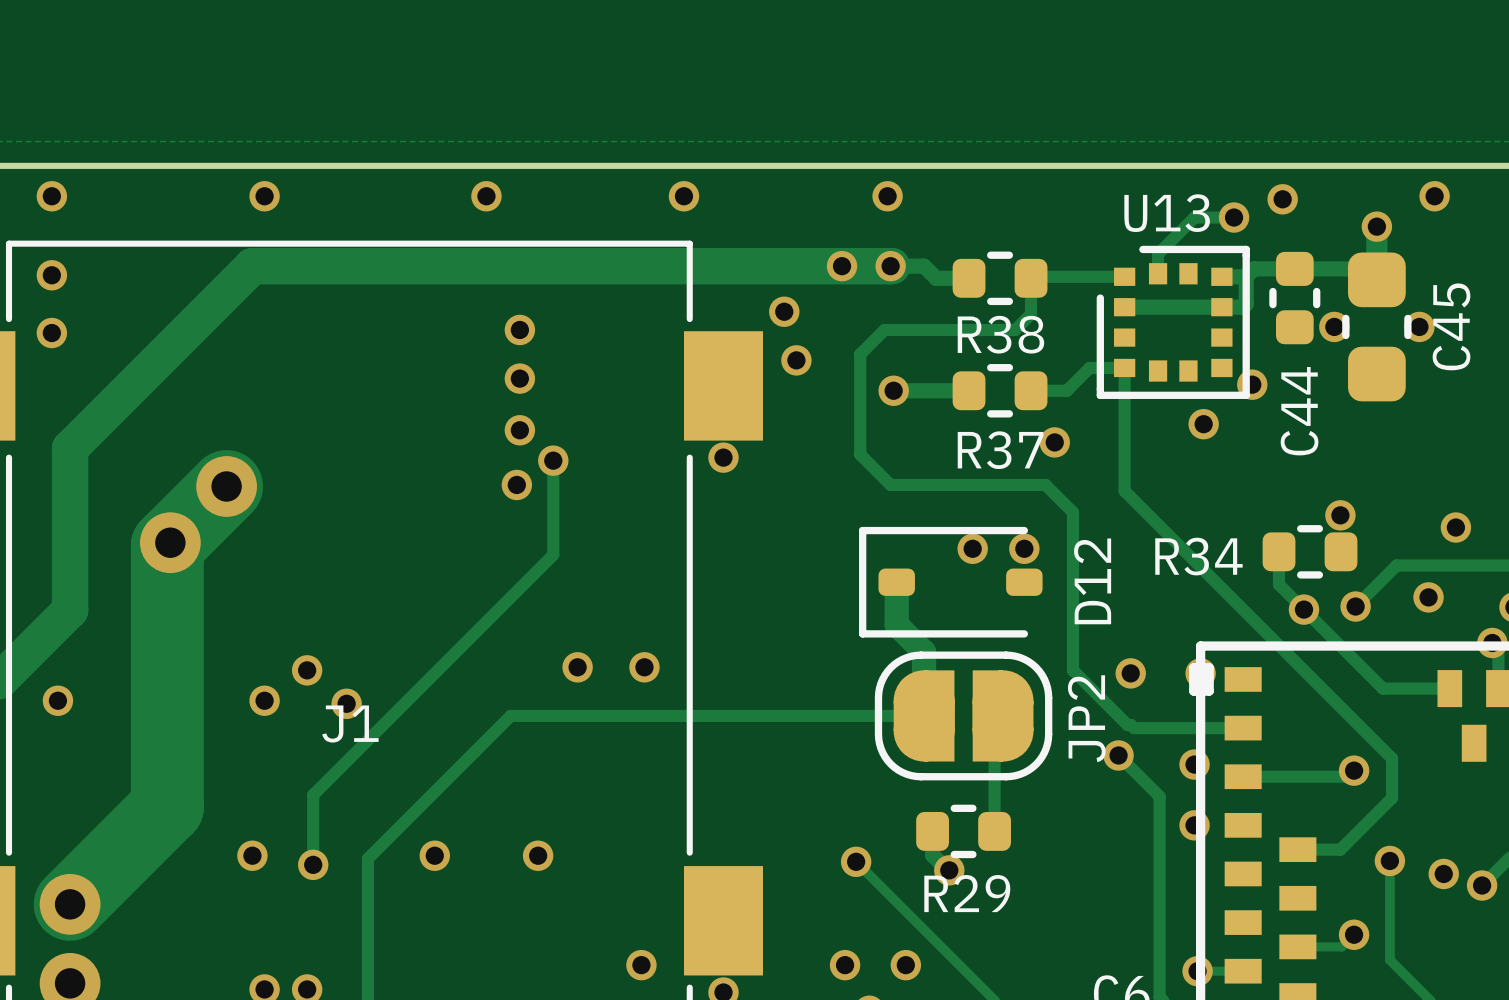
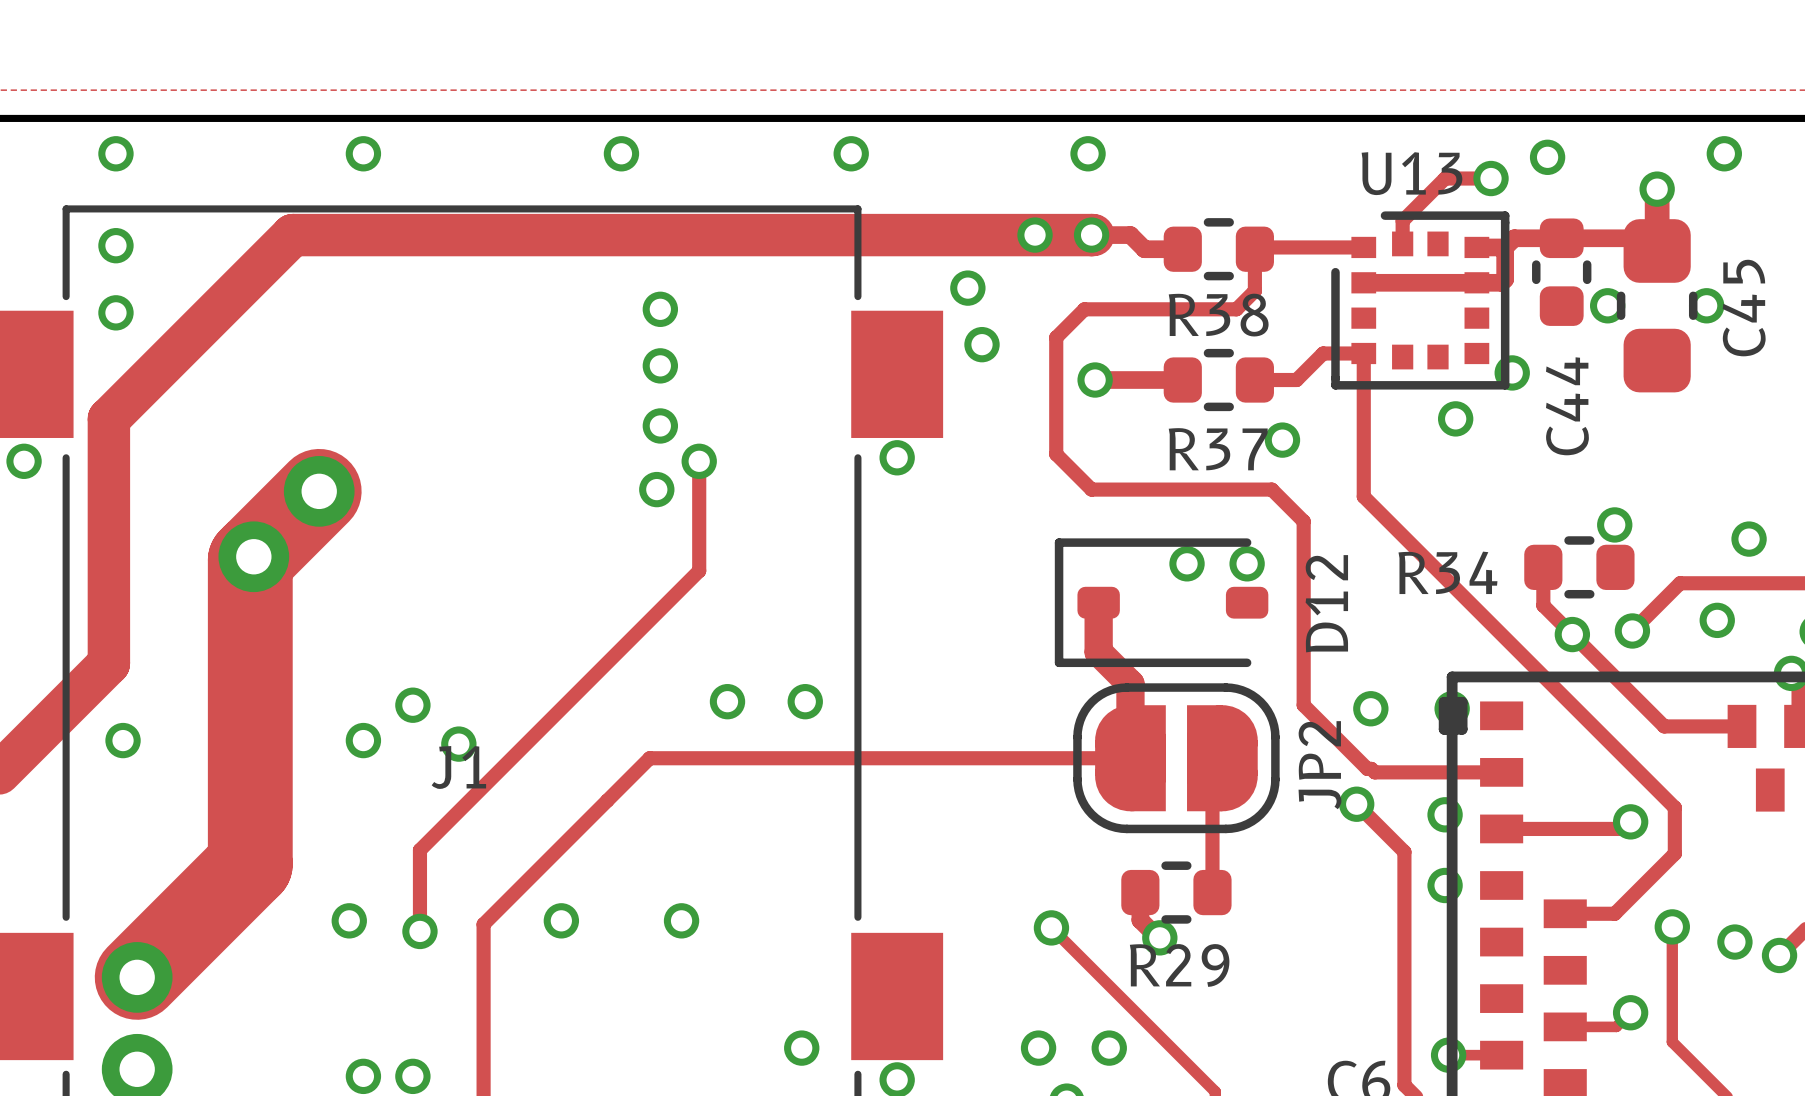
track: (252, 266) (70, 448) (70, 610) (45, 634) -> (349, 235) (292, 235) (108, 418) (108, 663)

